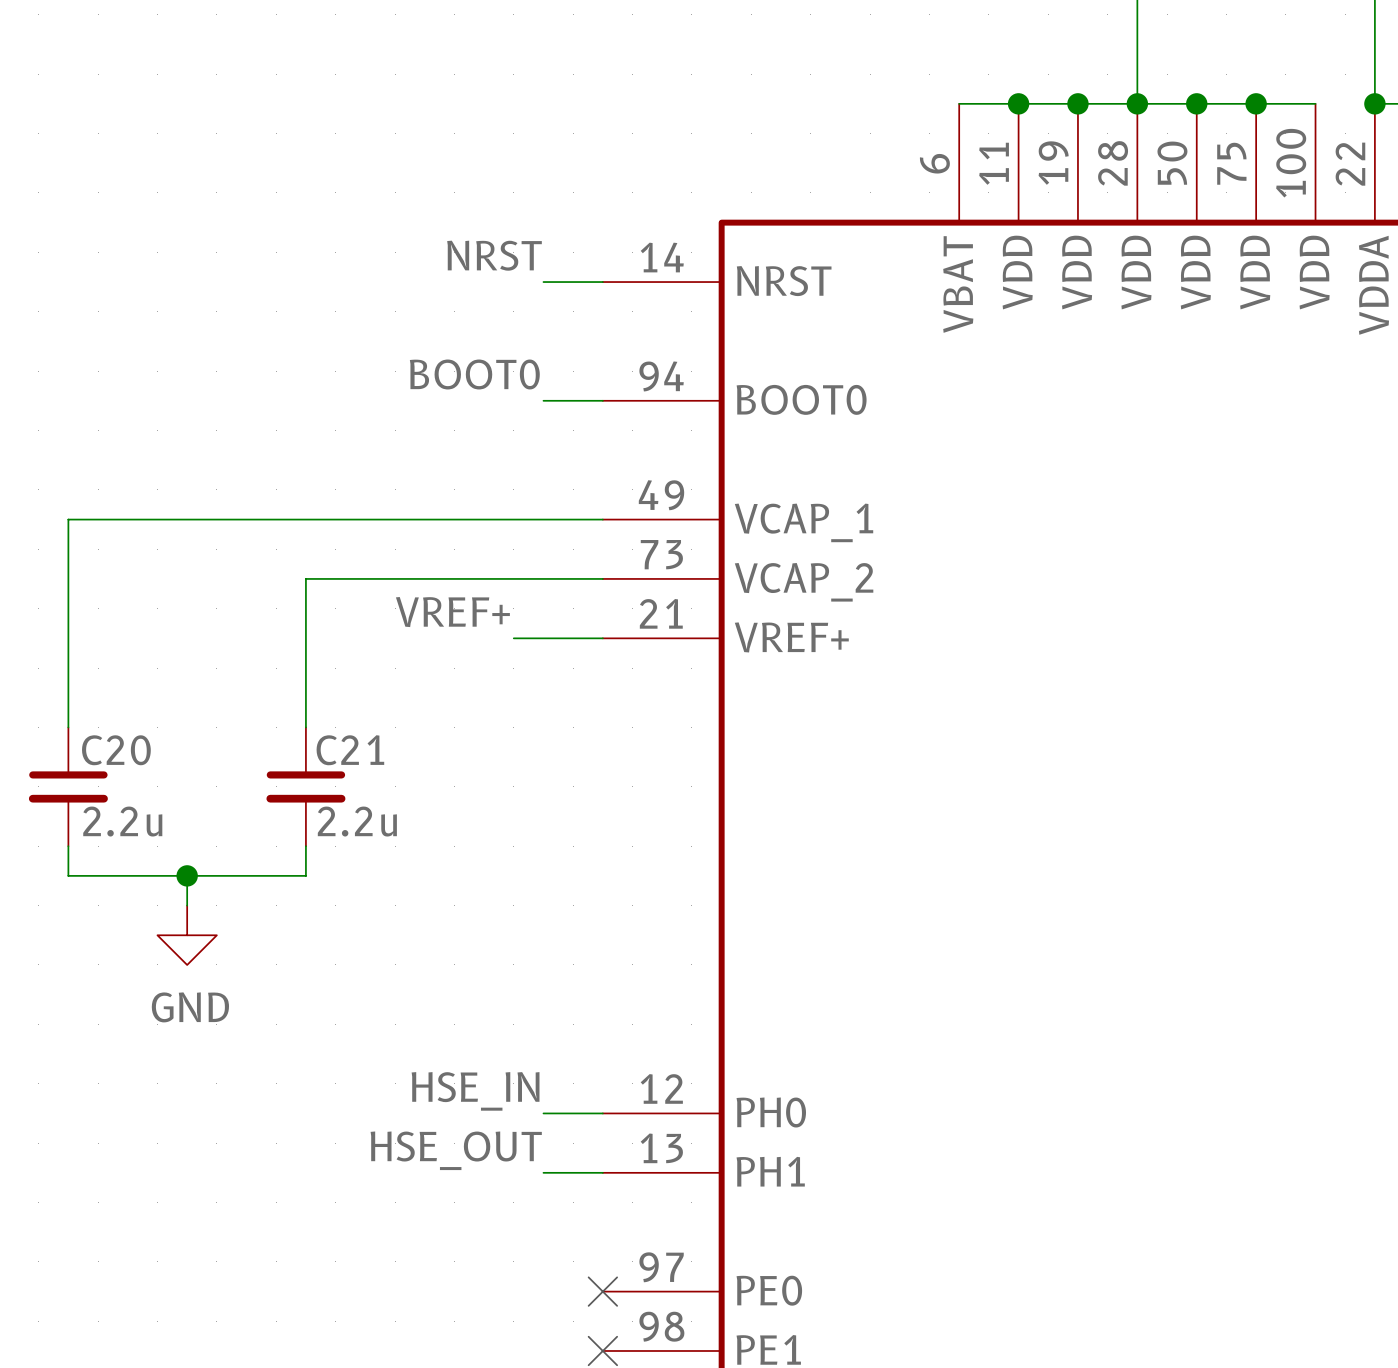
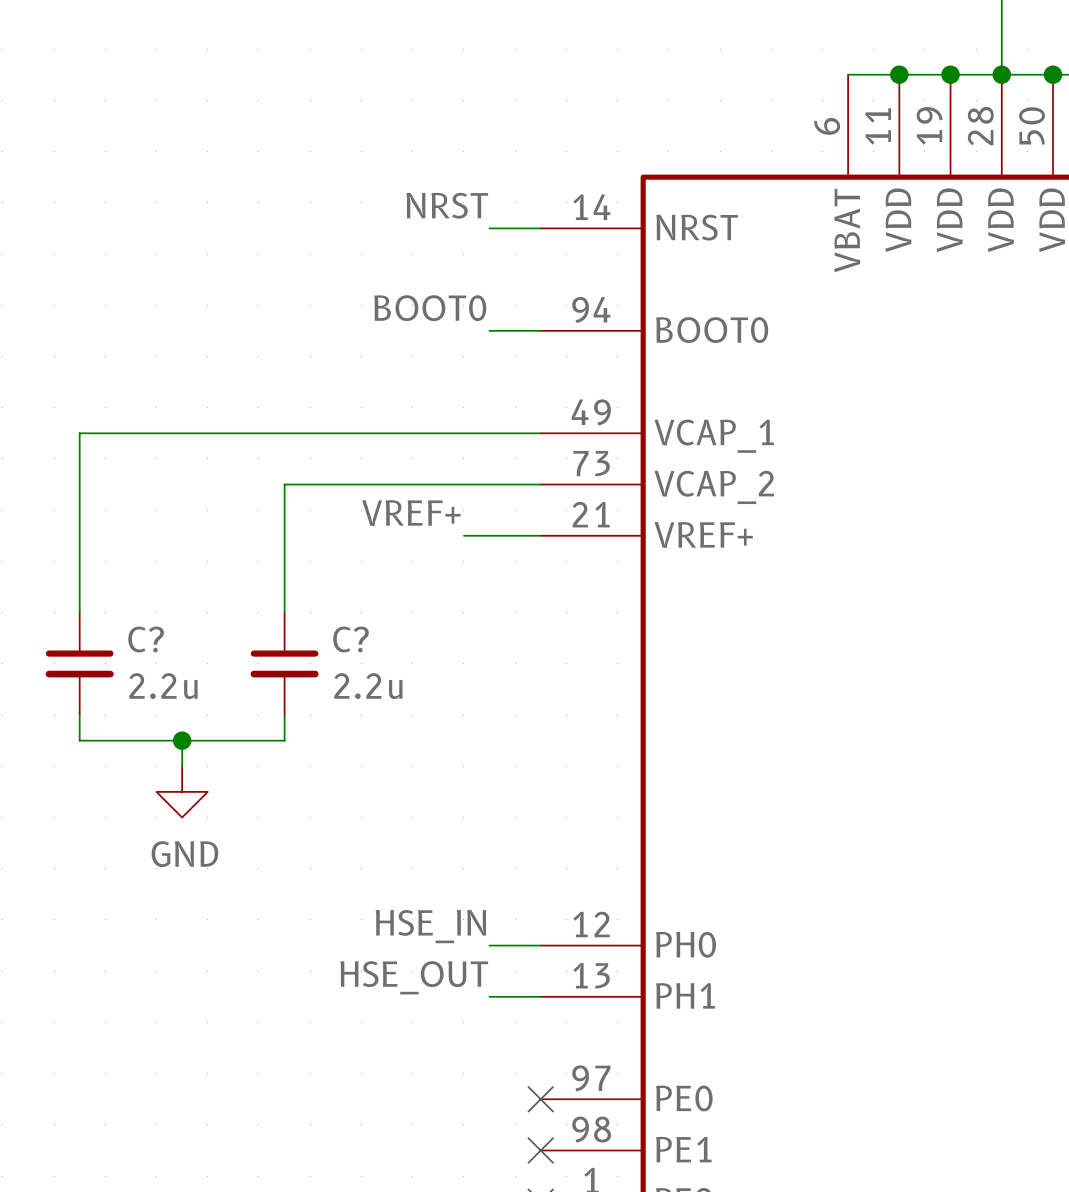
C20 name: C20 (116, 750) -> C? (146, 639)
C21 name: C21 (350, 750) -> C? (351, 639)
C20 value position: 2.2u (122, 821) -> 2.2u (163, 686)
C21 value position: 2.2u (357, 821) -> 2.2u (368, 686)

